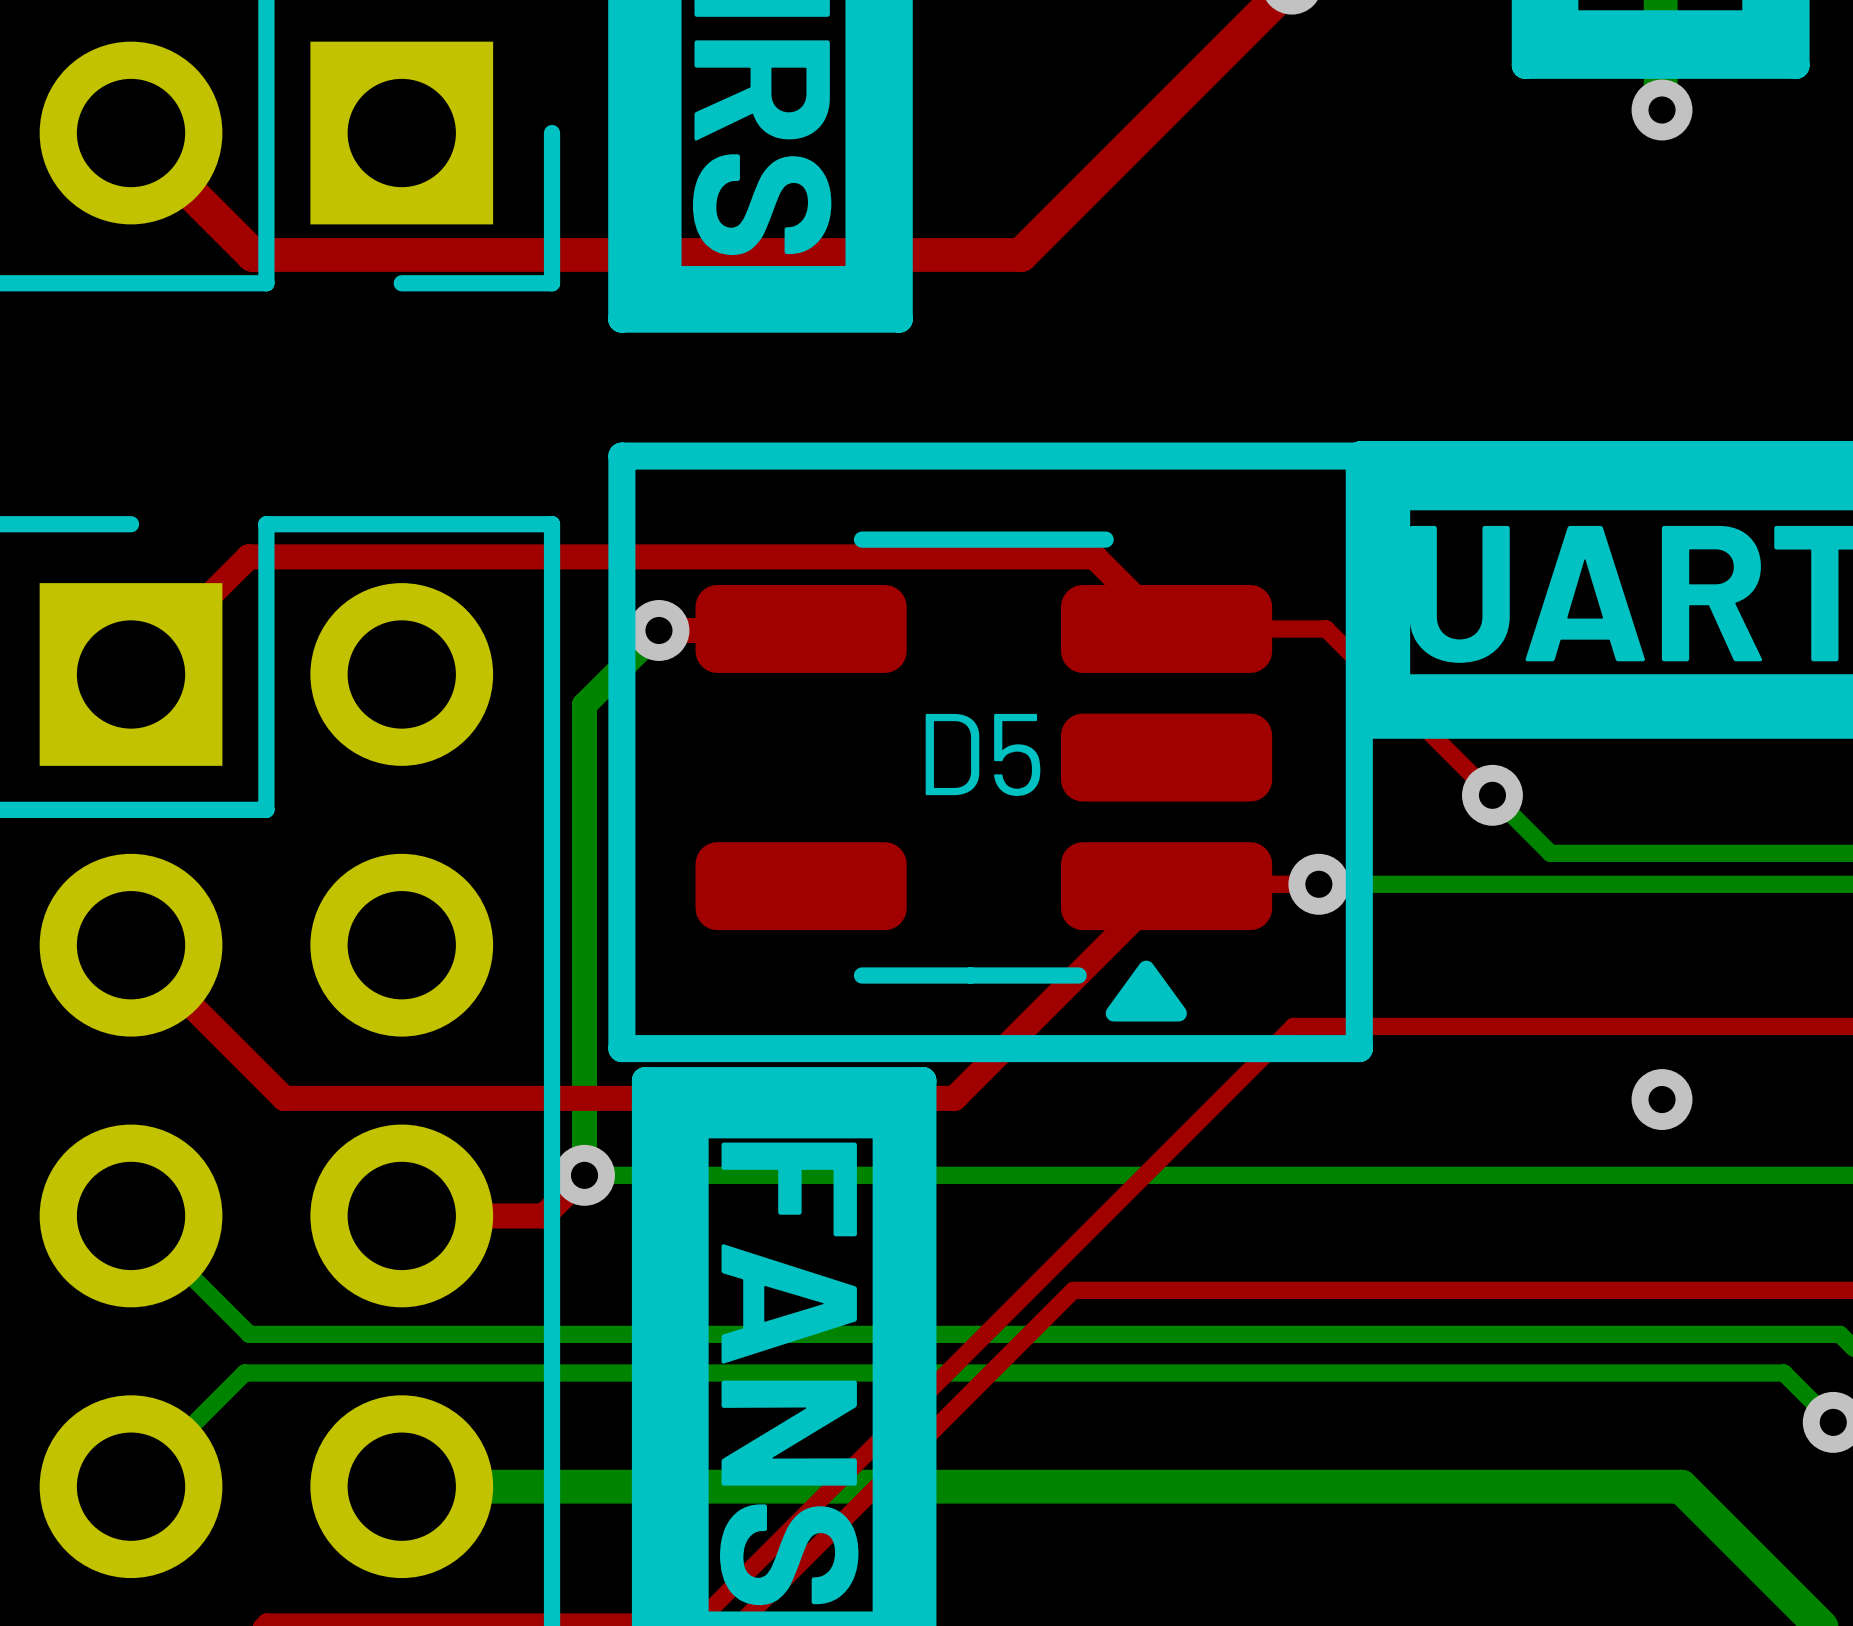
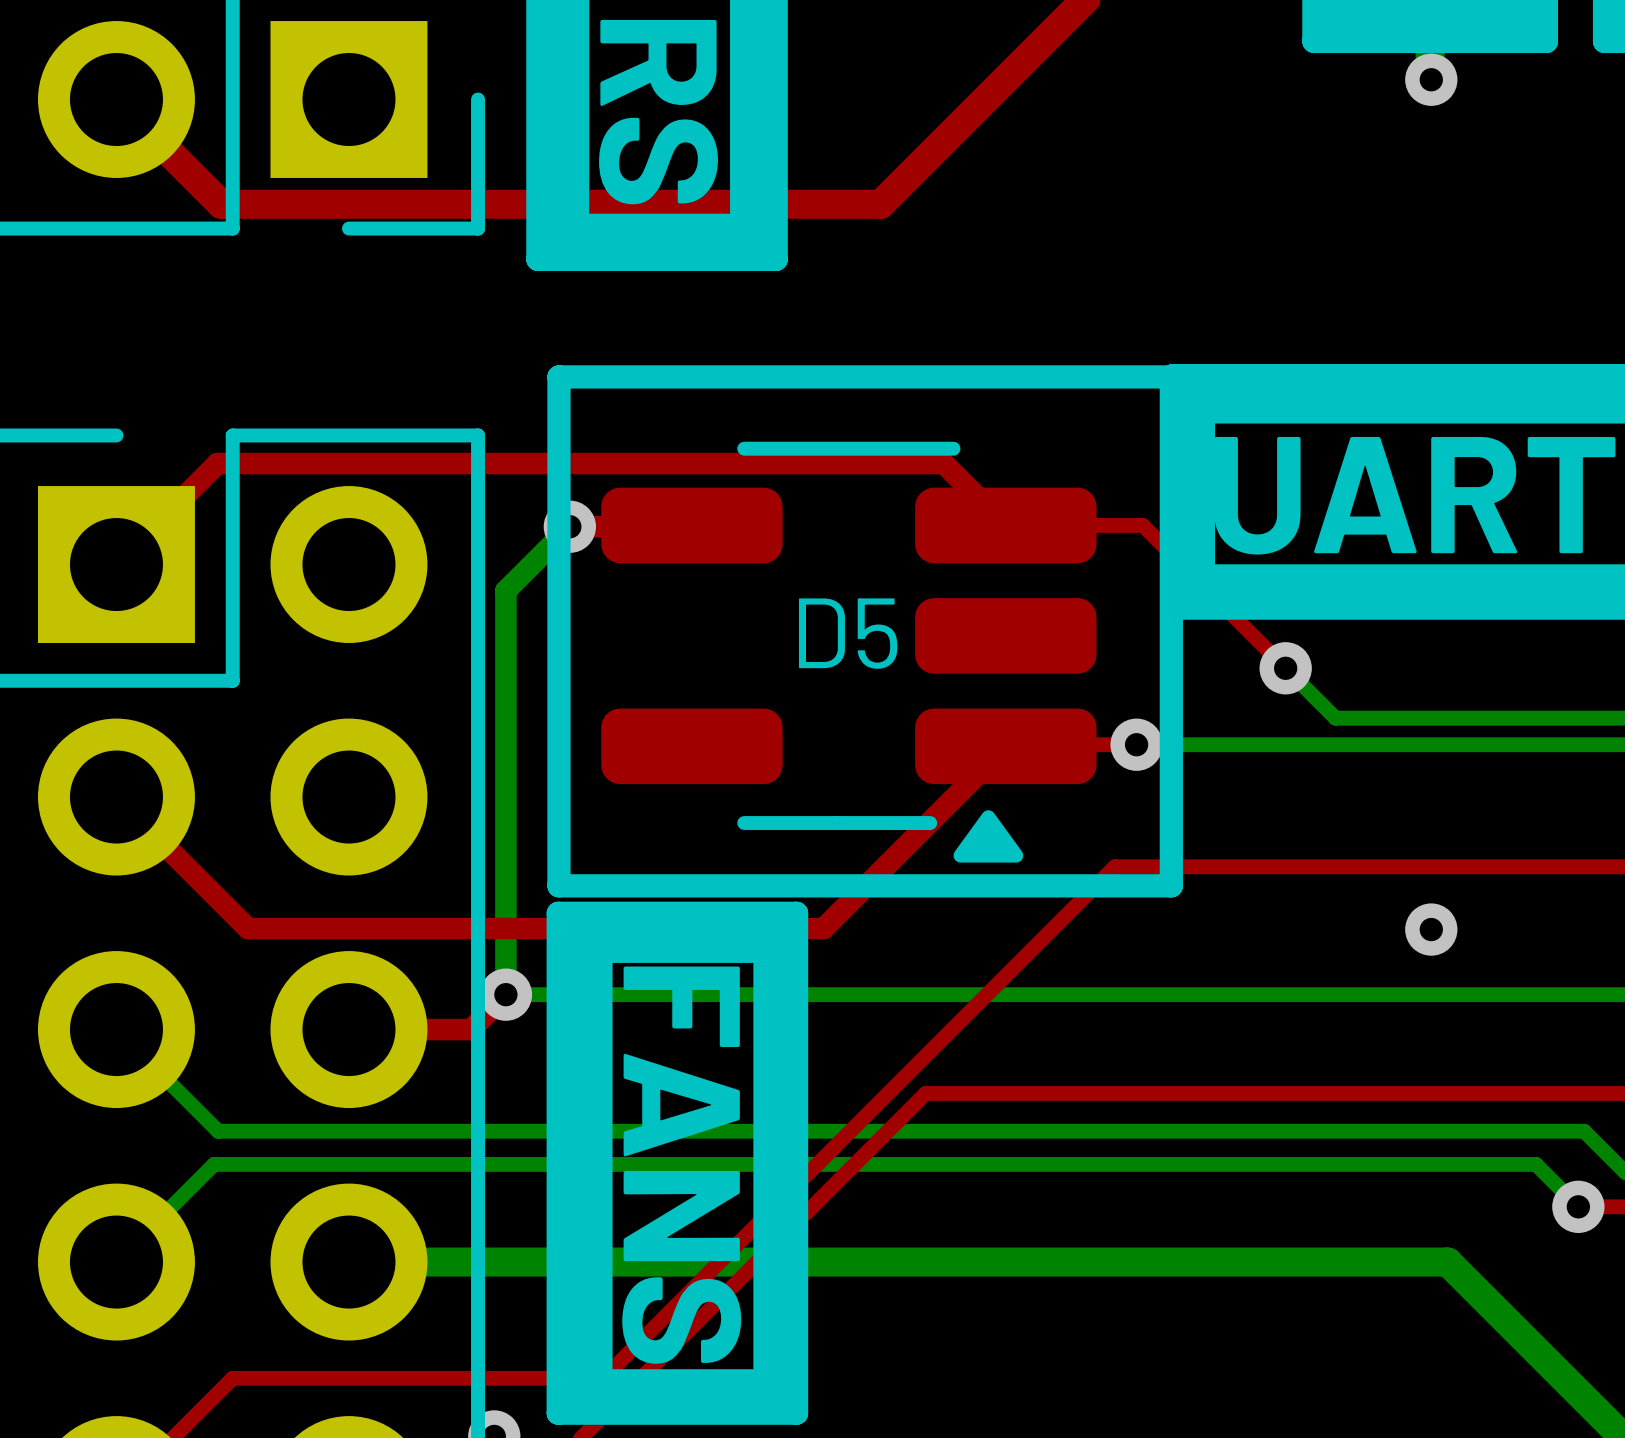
line: (646, 456) (621, 456) (621, 1048) (646, 1048) -> (558, 376) (558, 885)

